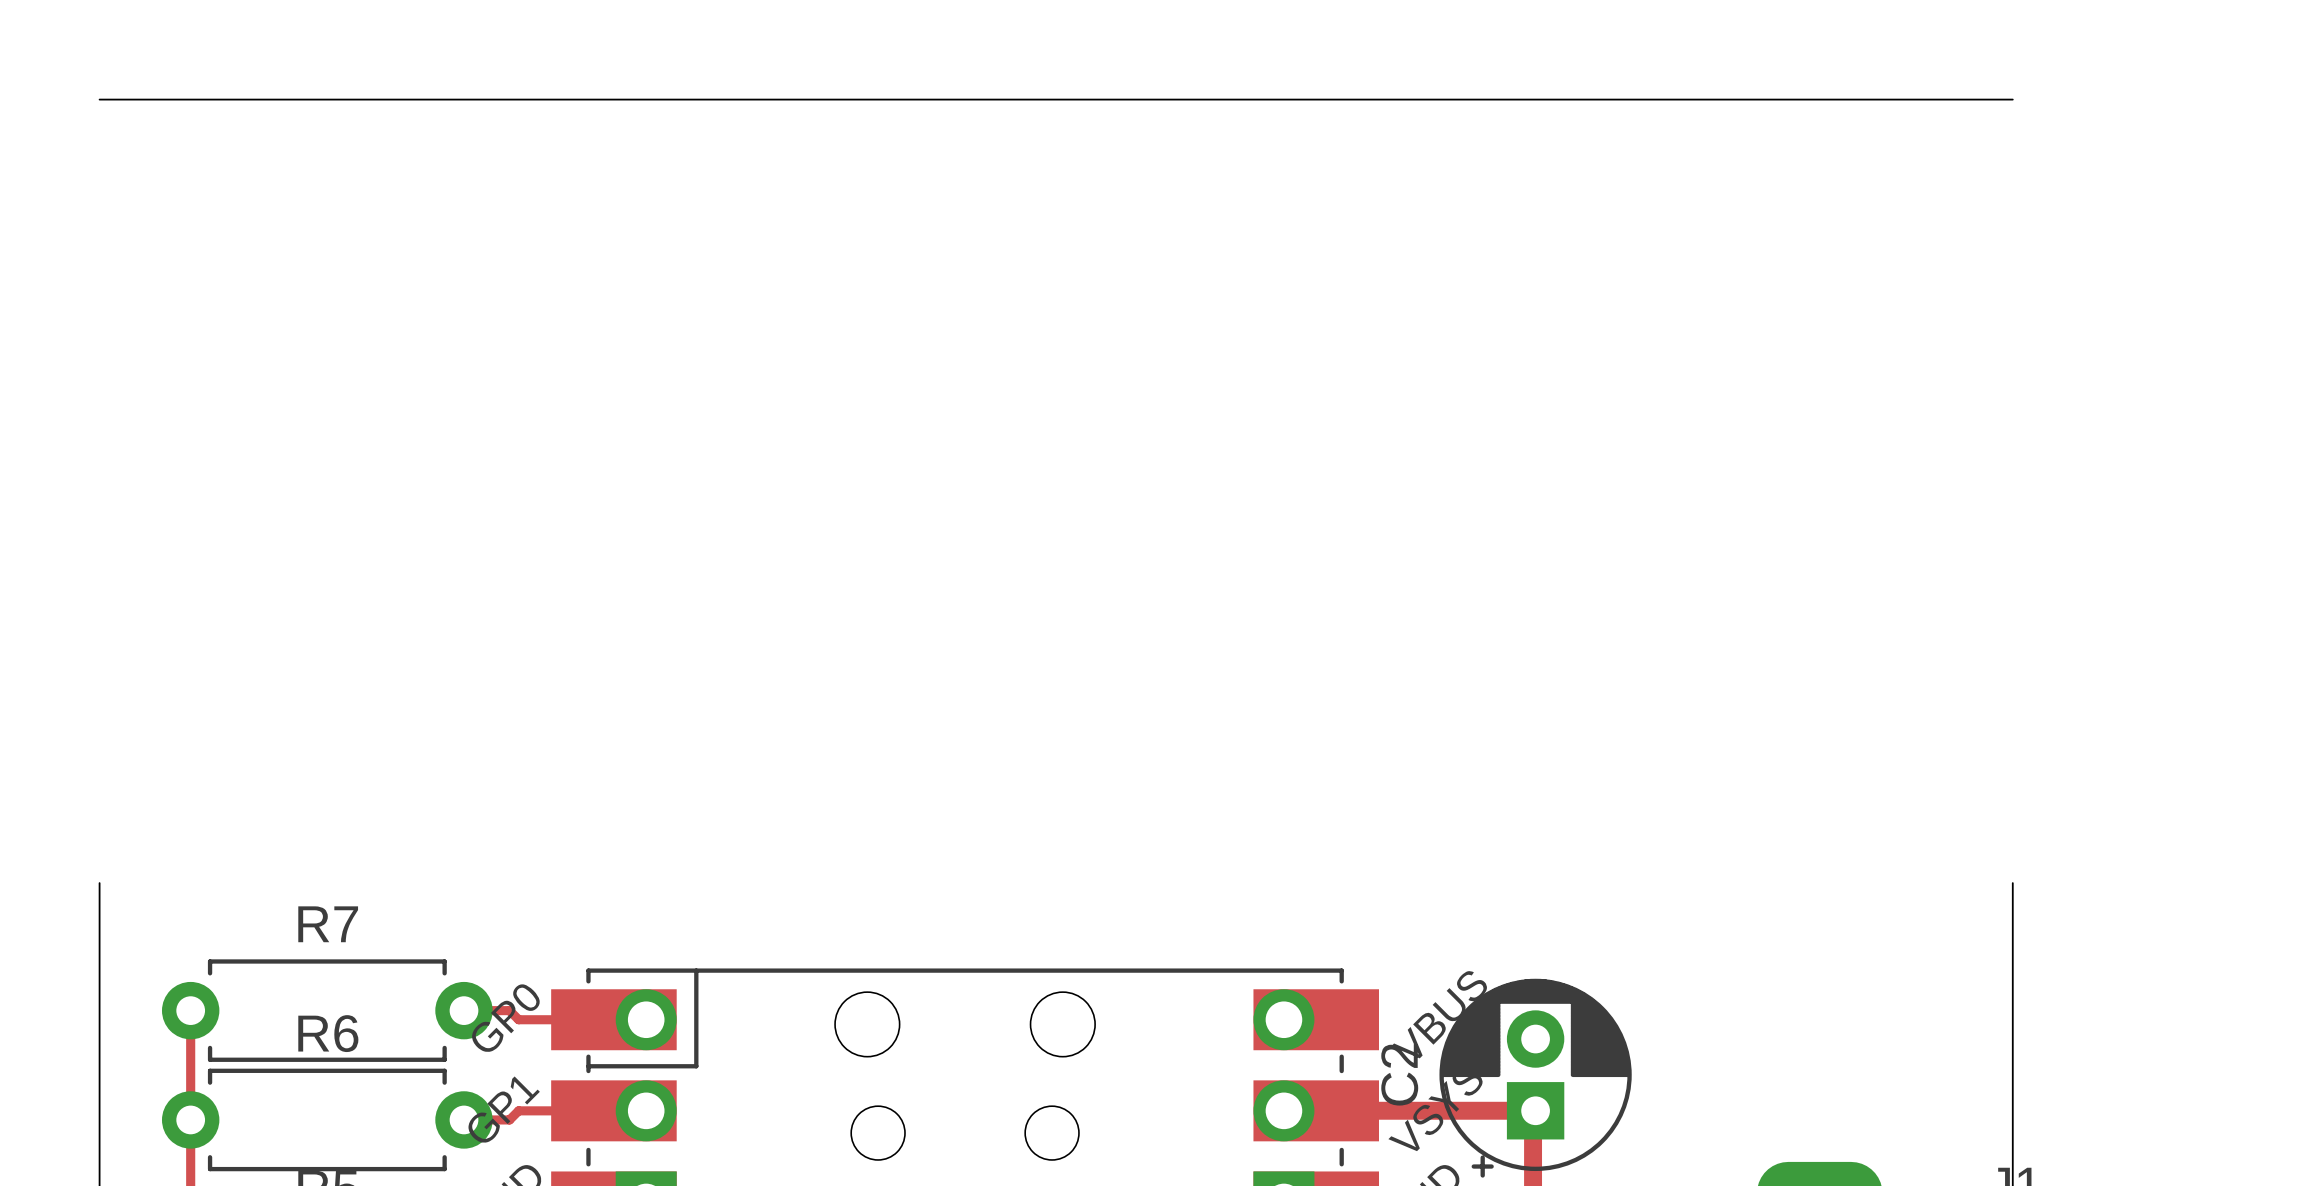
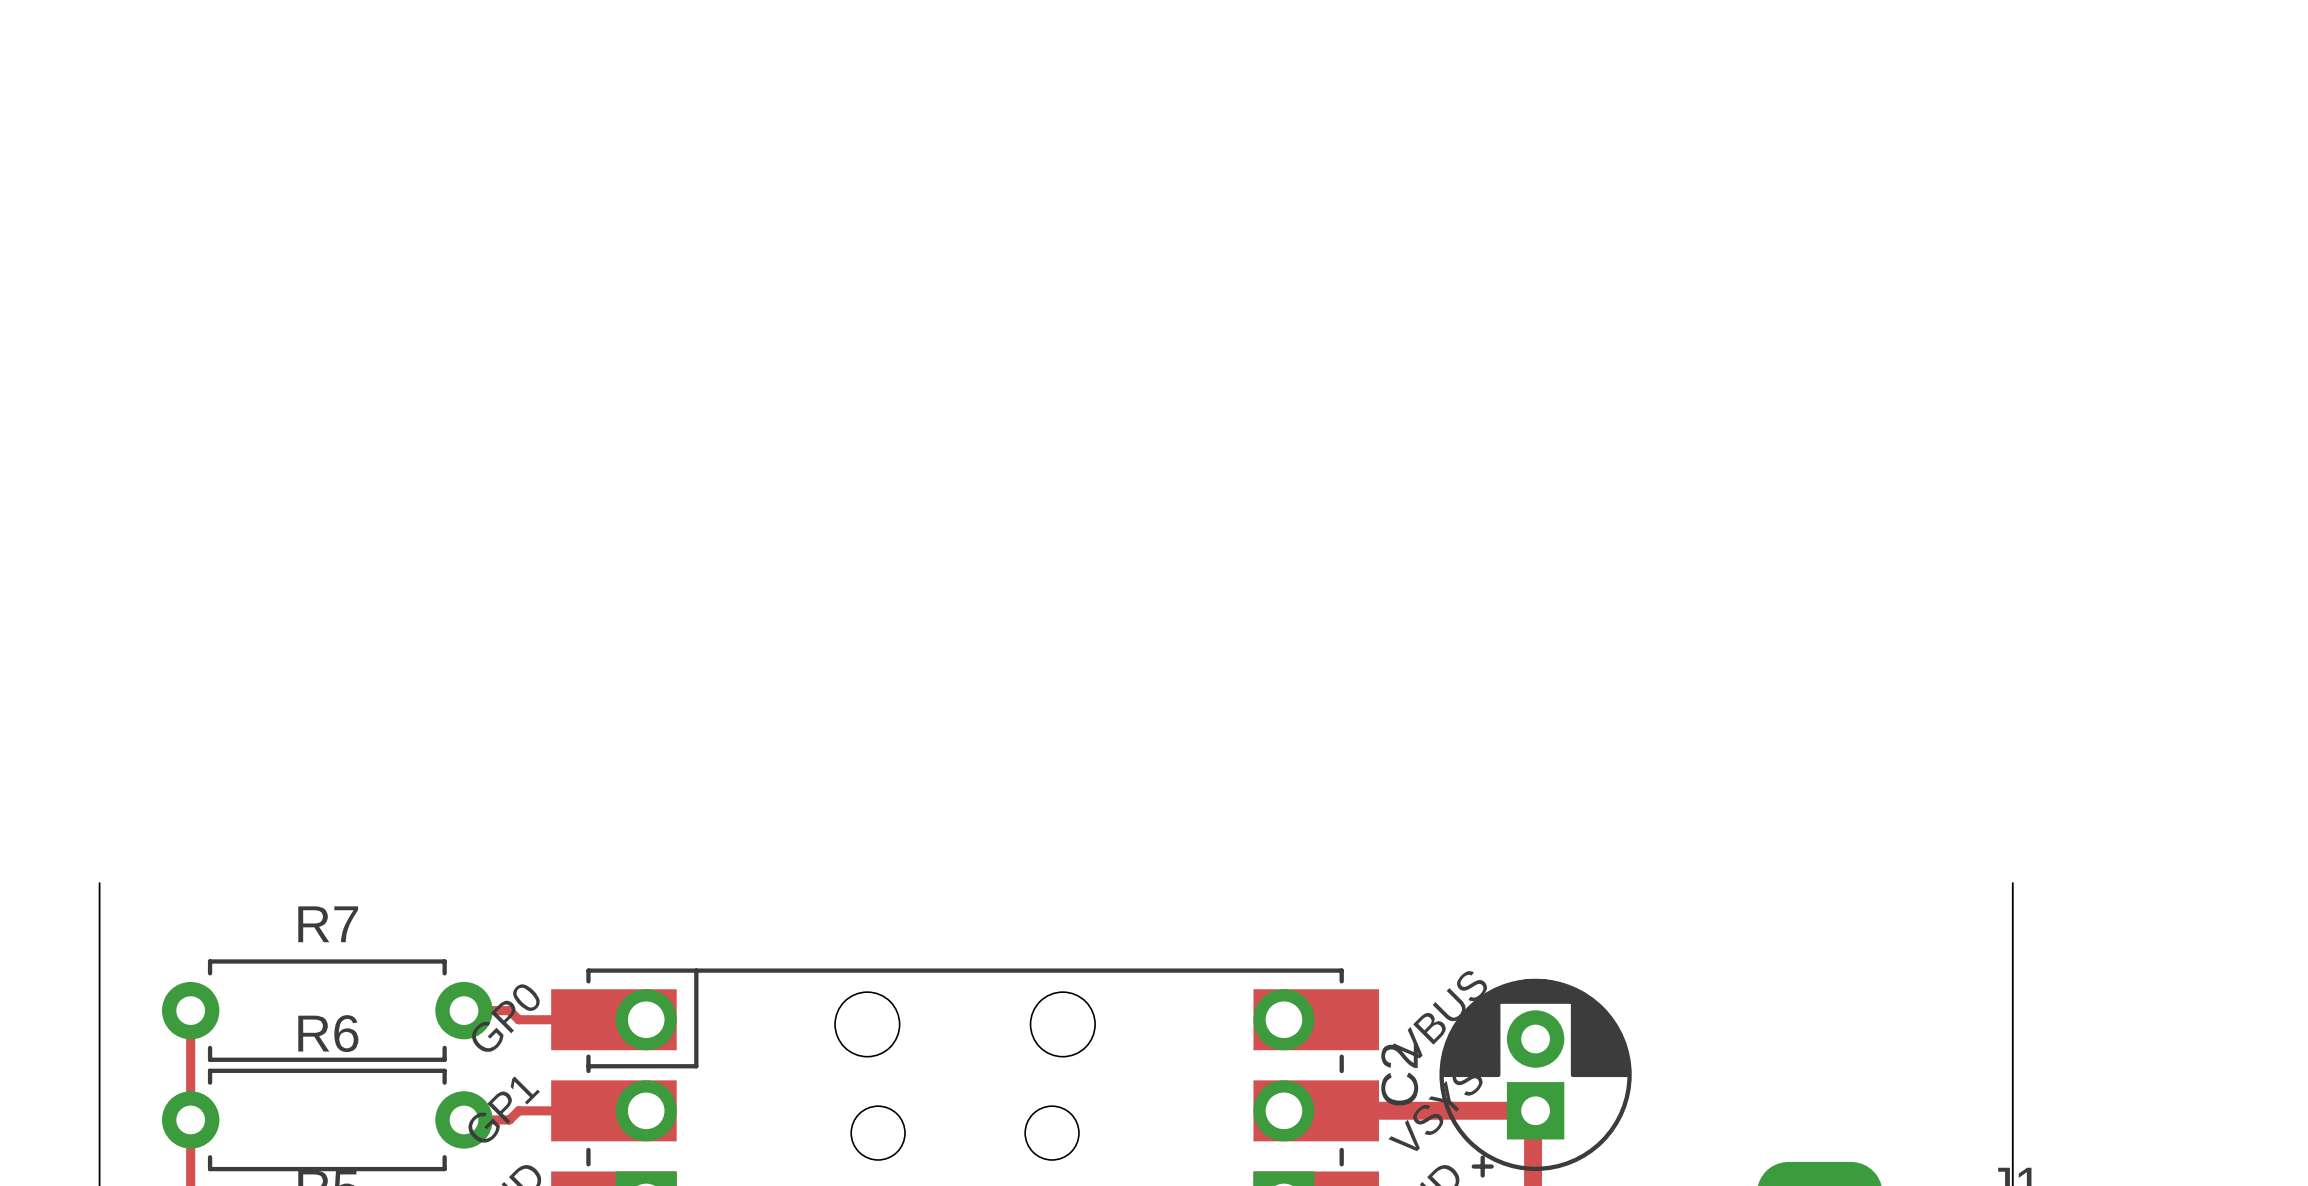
board edge: (99, 99) (2012, 99) -> none

